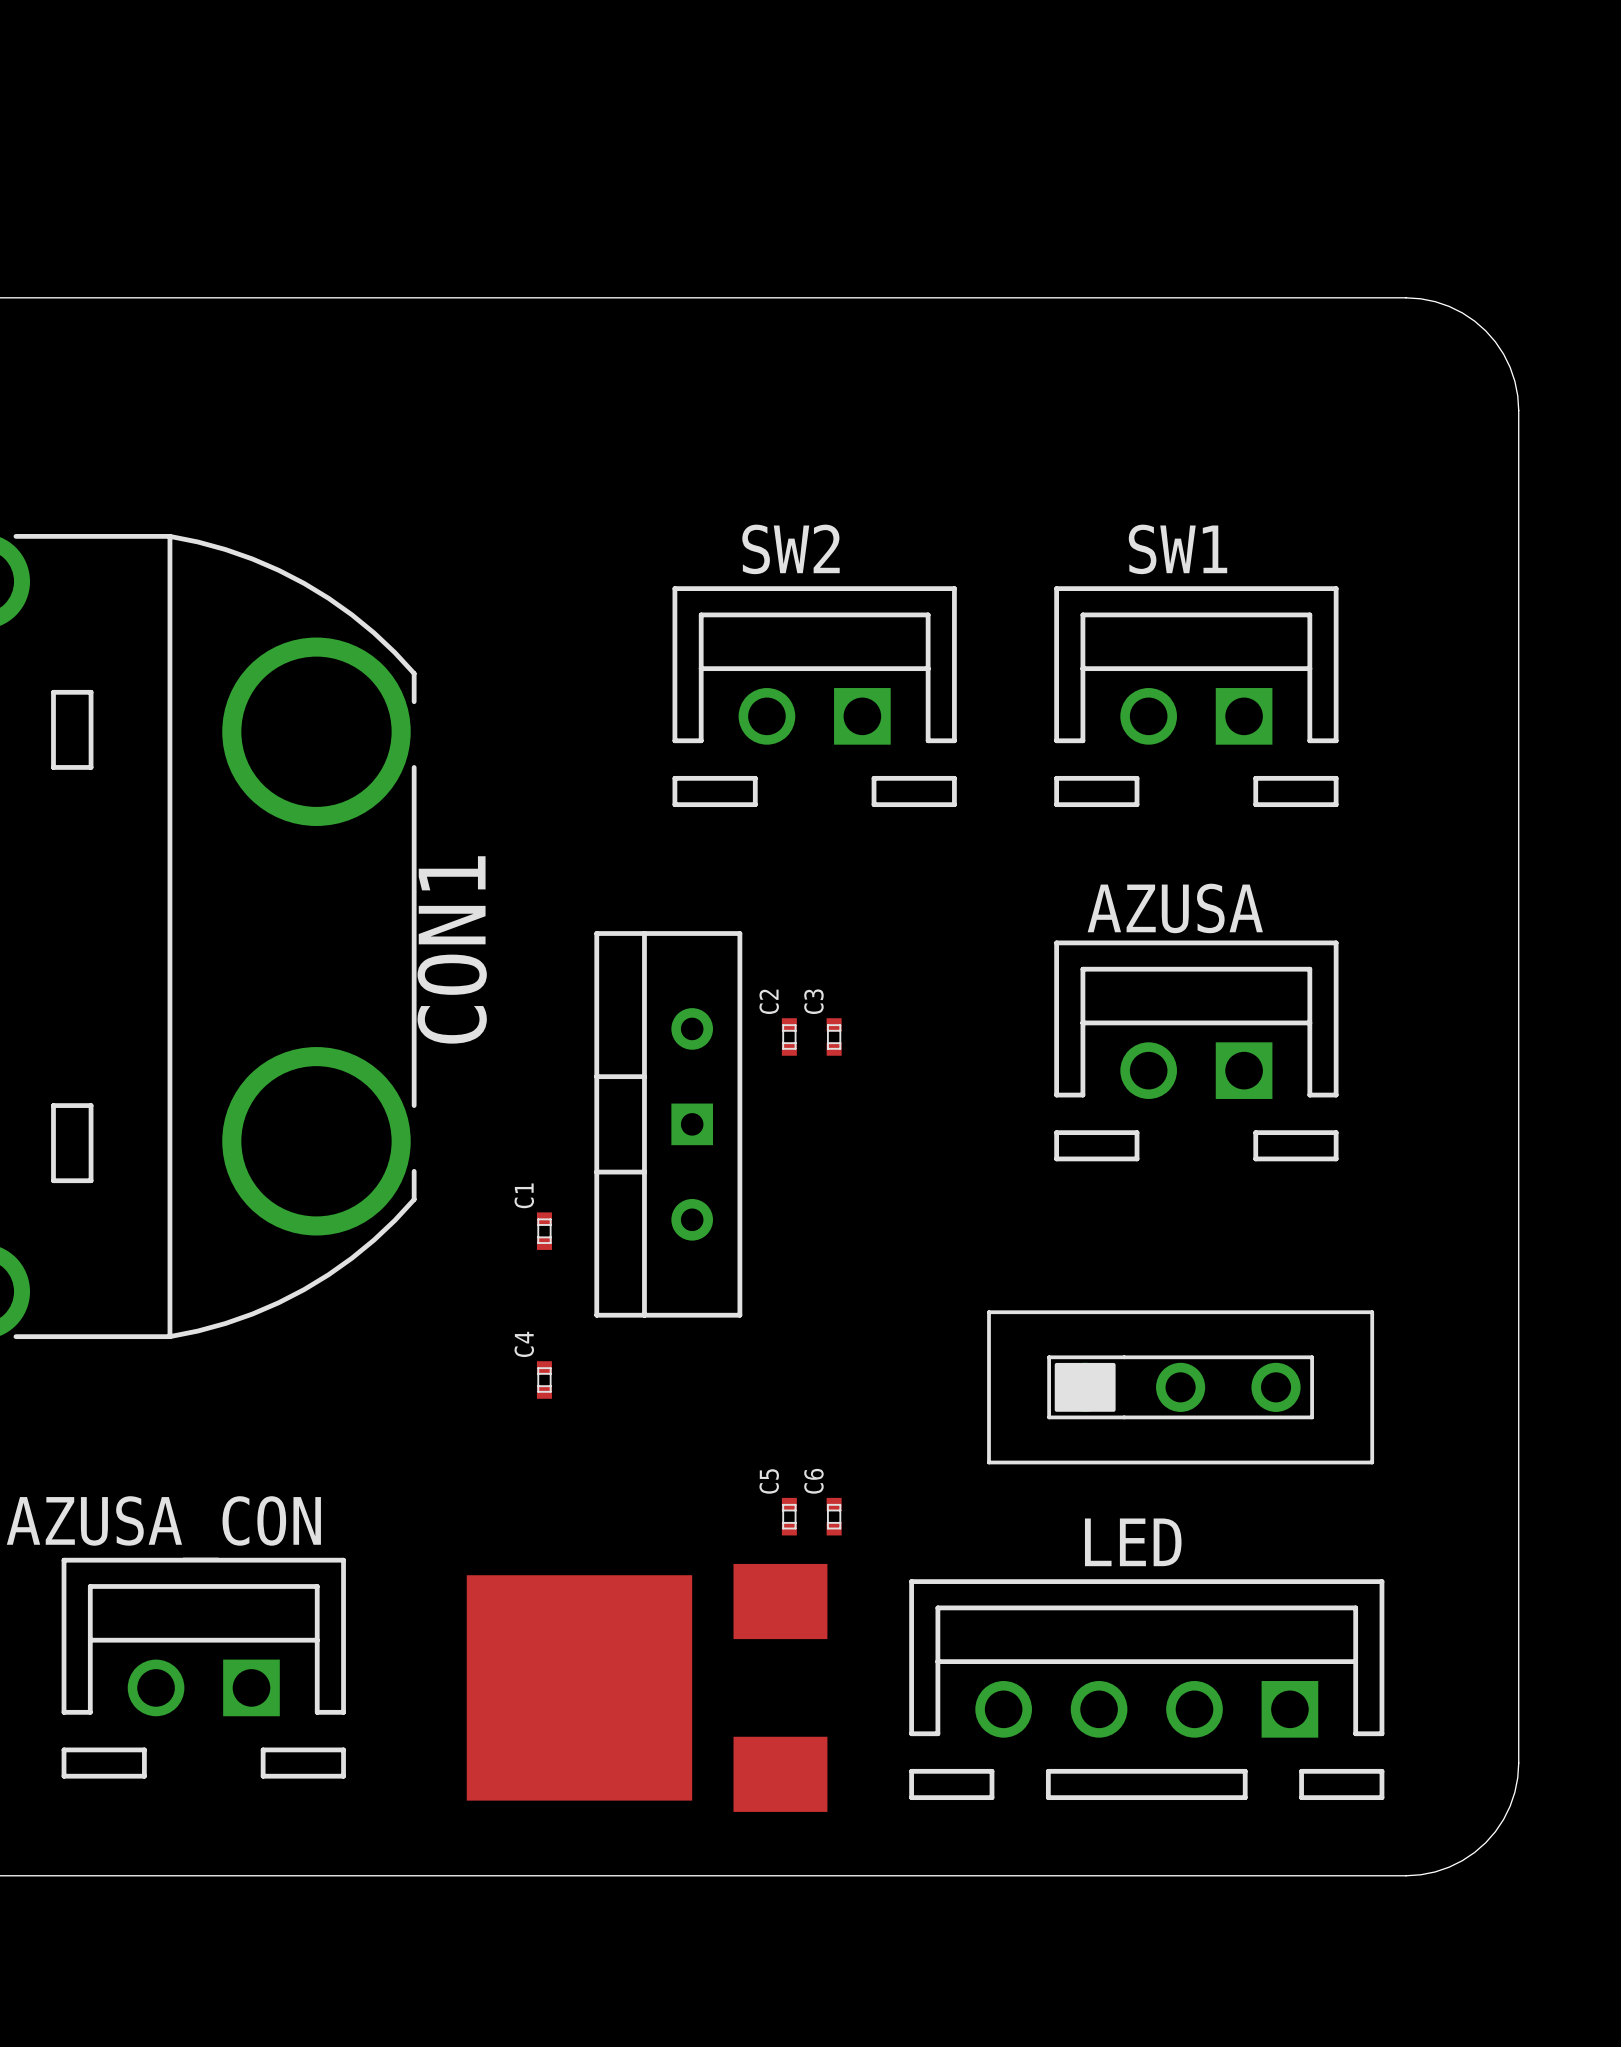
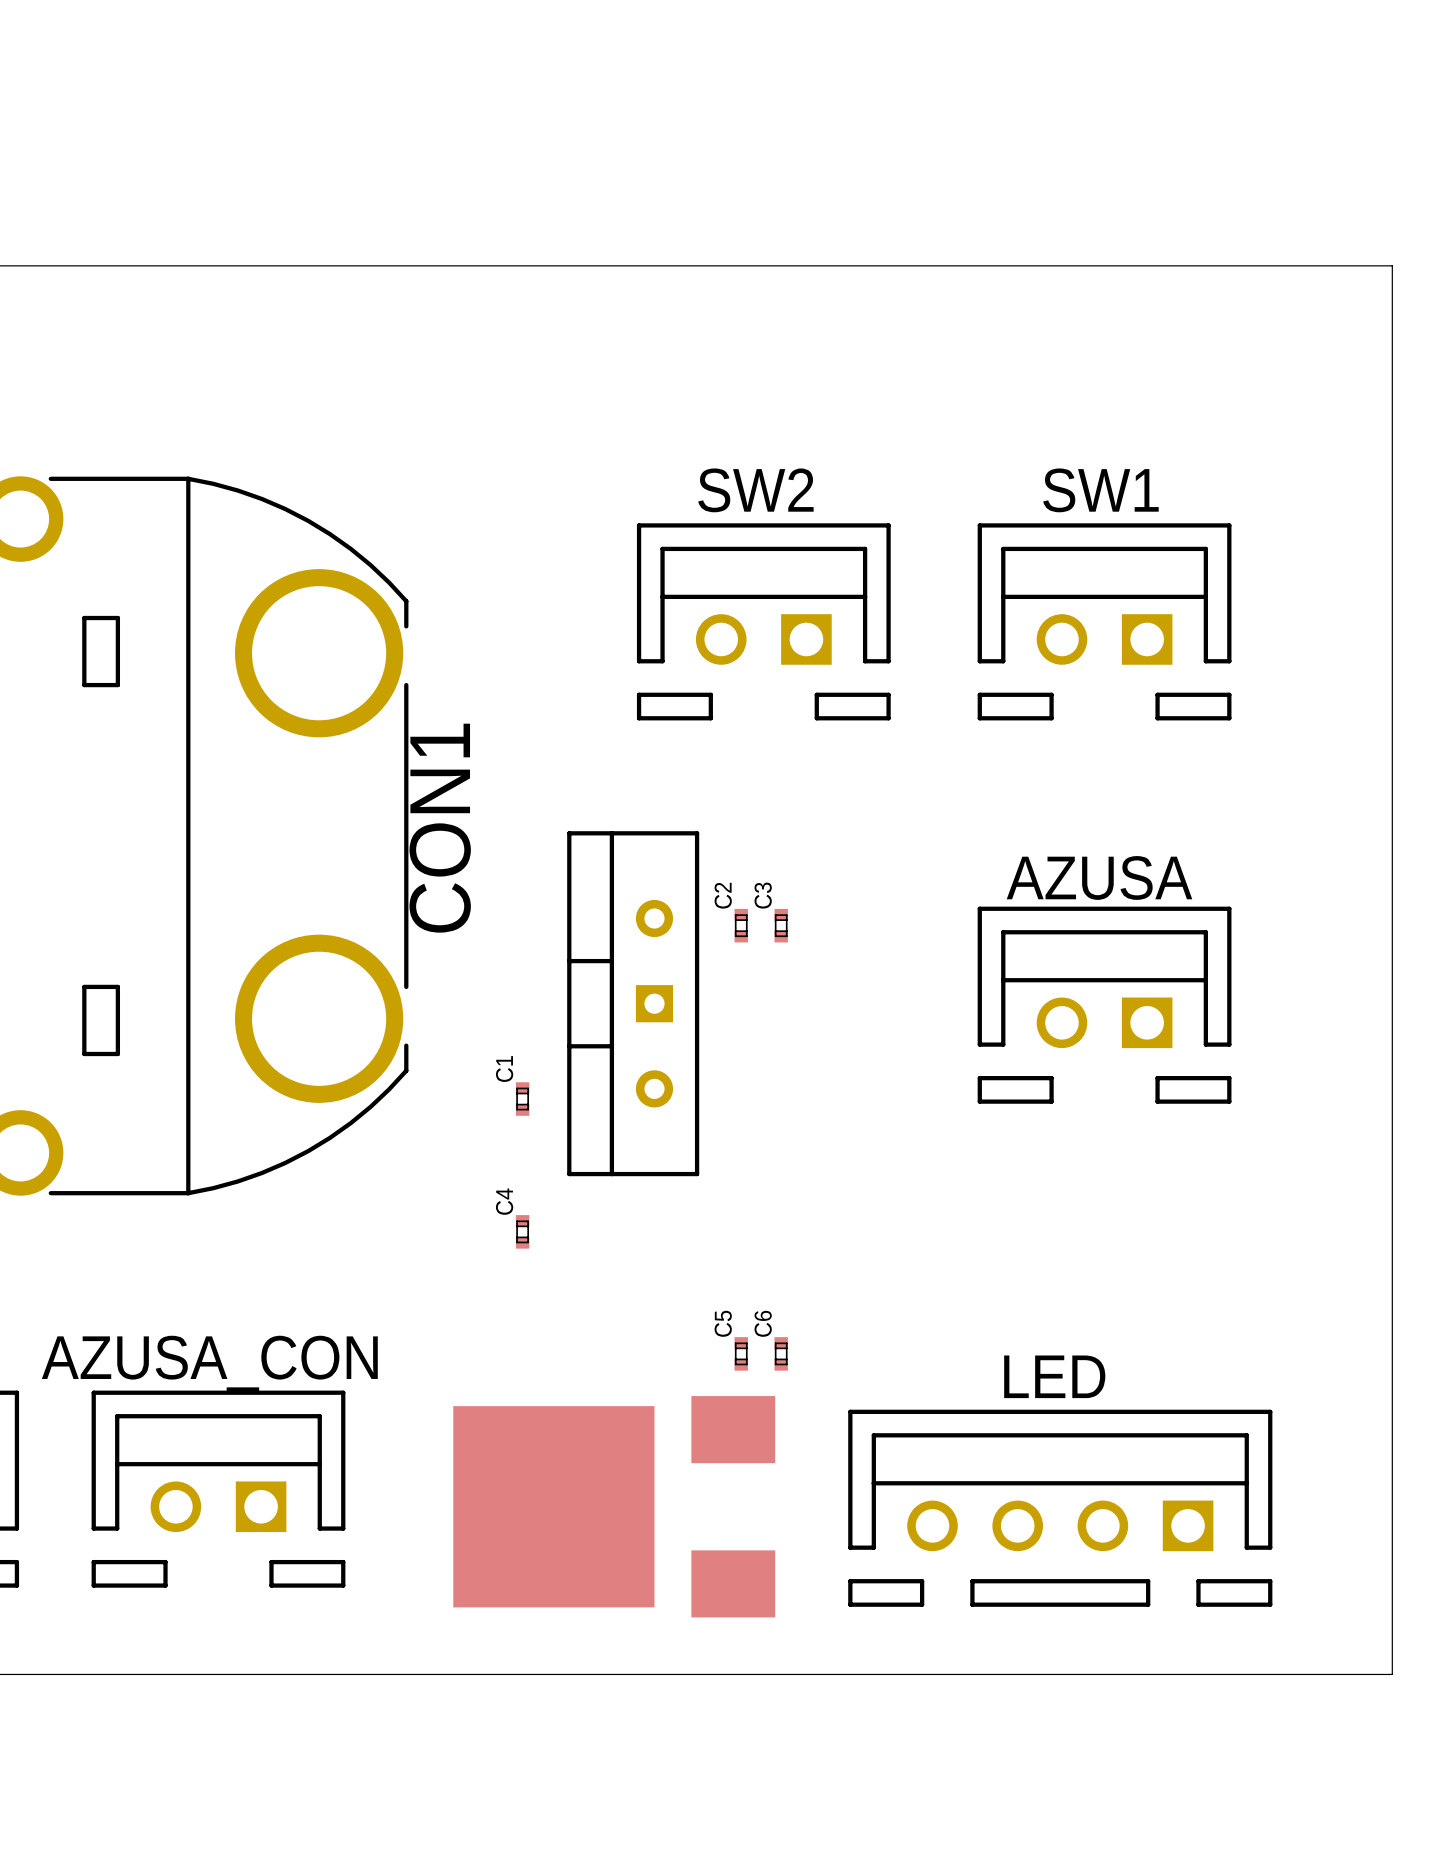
board edge: (1406, 297) (1435, 301) (1449, 306) (1474, 321) (1485, 330) (1495, 341) (1510, 367) (1514, 381) (1518, 410) -> (1291, 265) (1392, 265) (1392, 366)
AZUSA position: (1196, 1050) -> (1104, 1005)
part: (1180, 1387) -> none
board edge: (1518, 1763) (1514, 1792) (1510, 1806) (1495, 1831) (1485, 1842) (1474, 1852) (1449, 1867) (1435, 1871) (1406, 1875) -> (1392, 1573) (1392, 1674) (1291, 1674)

